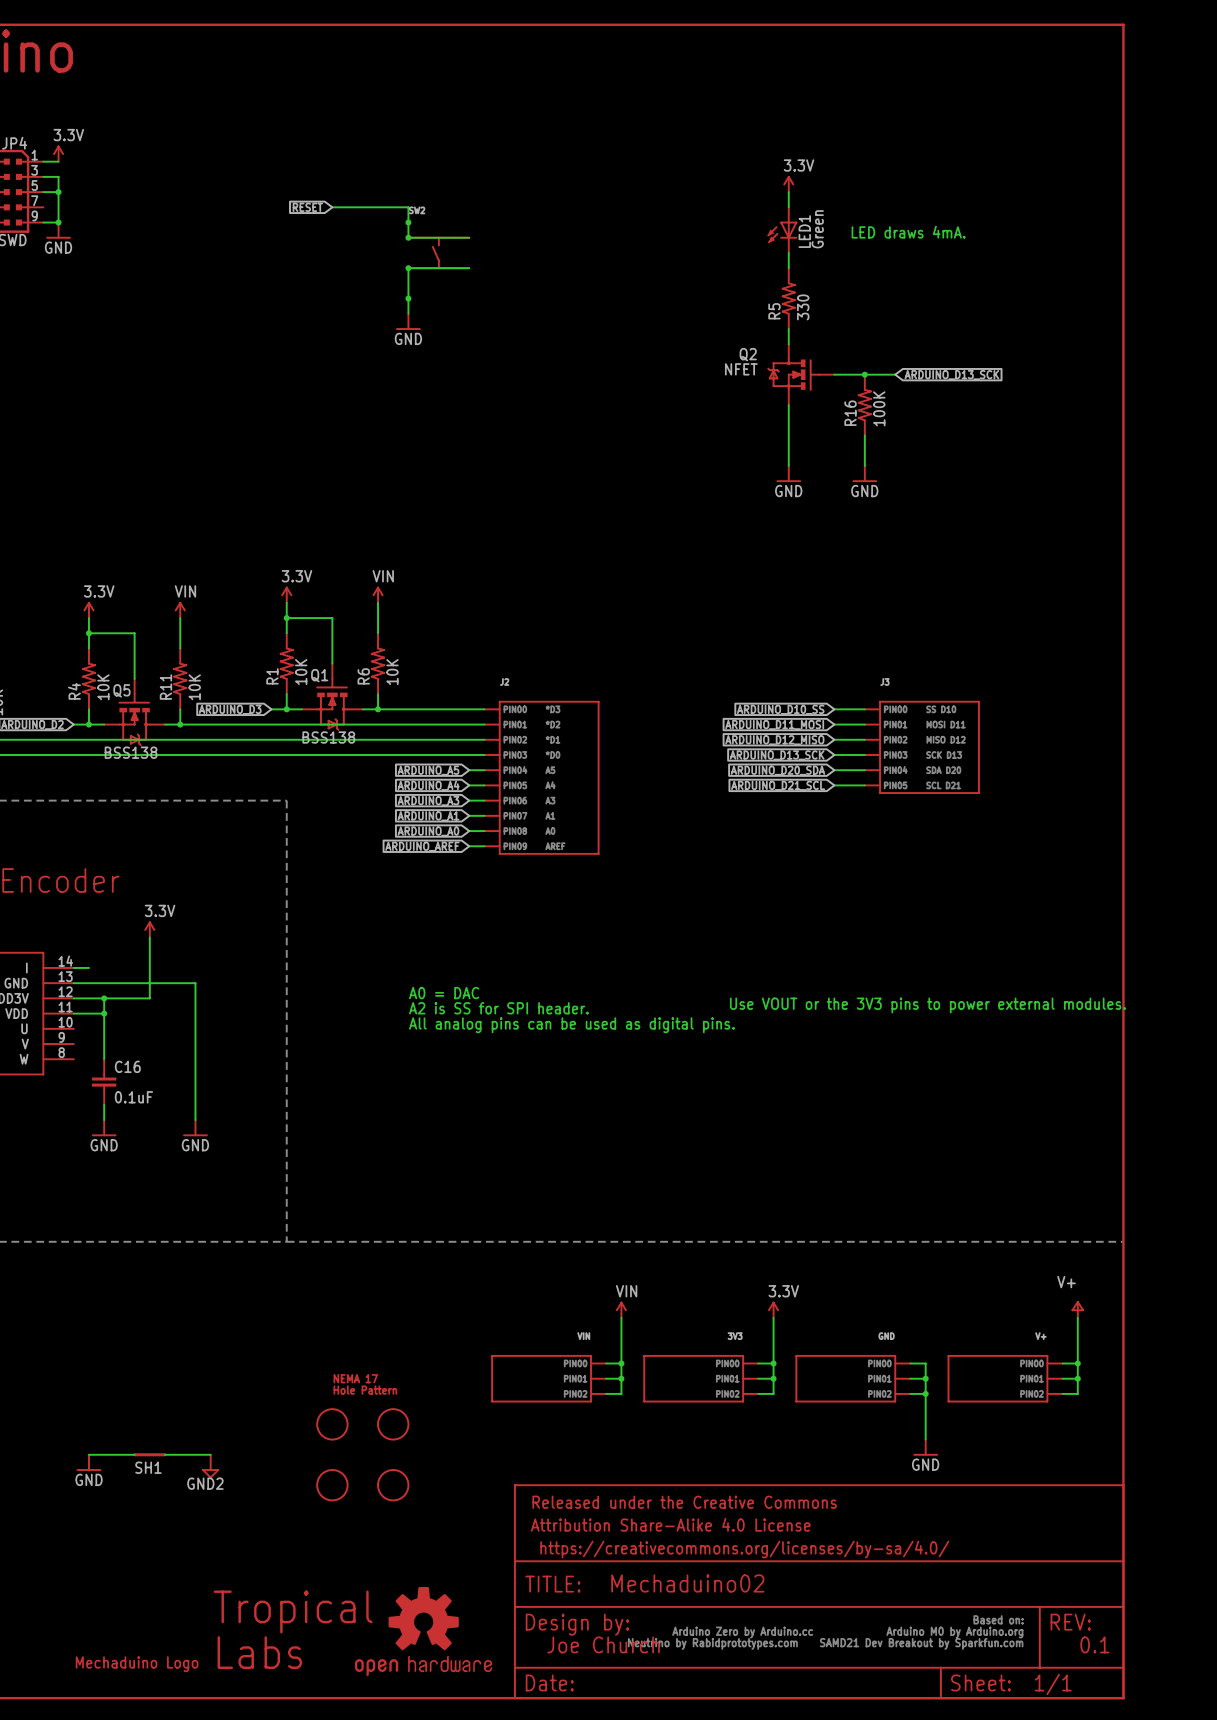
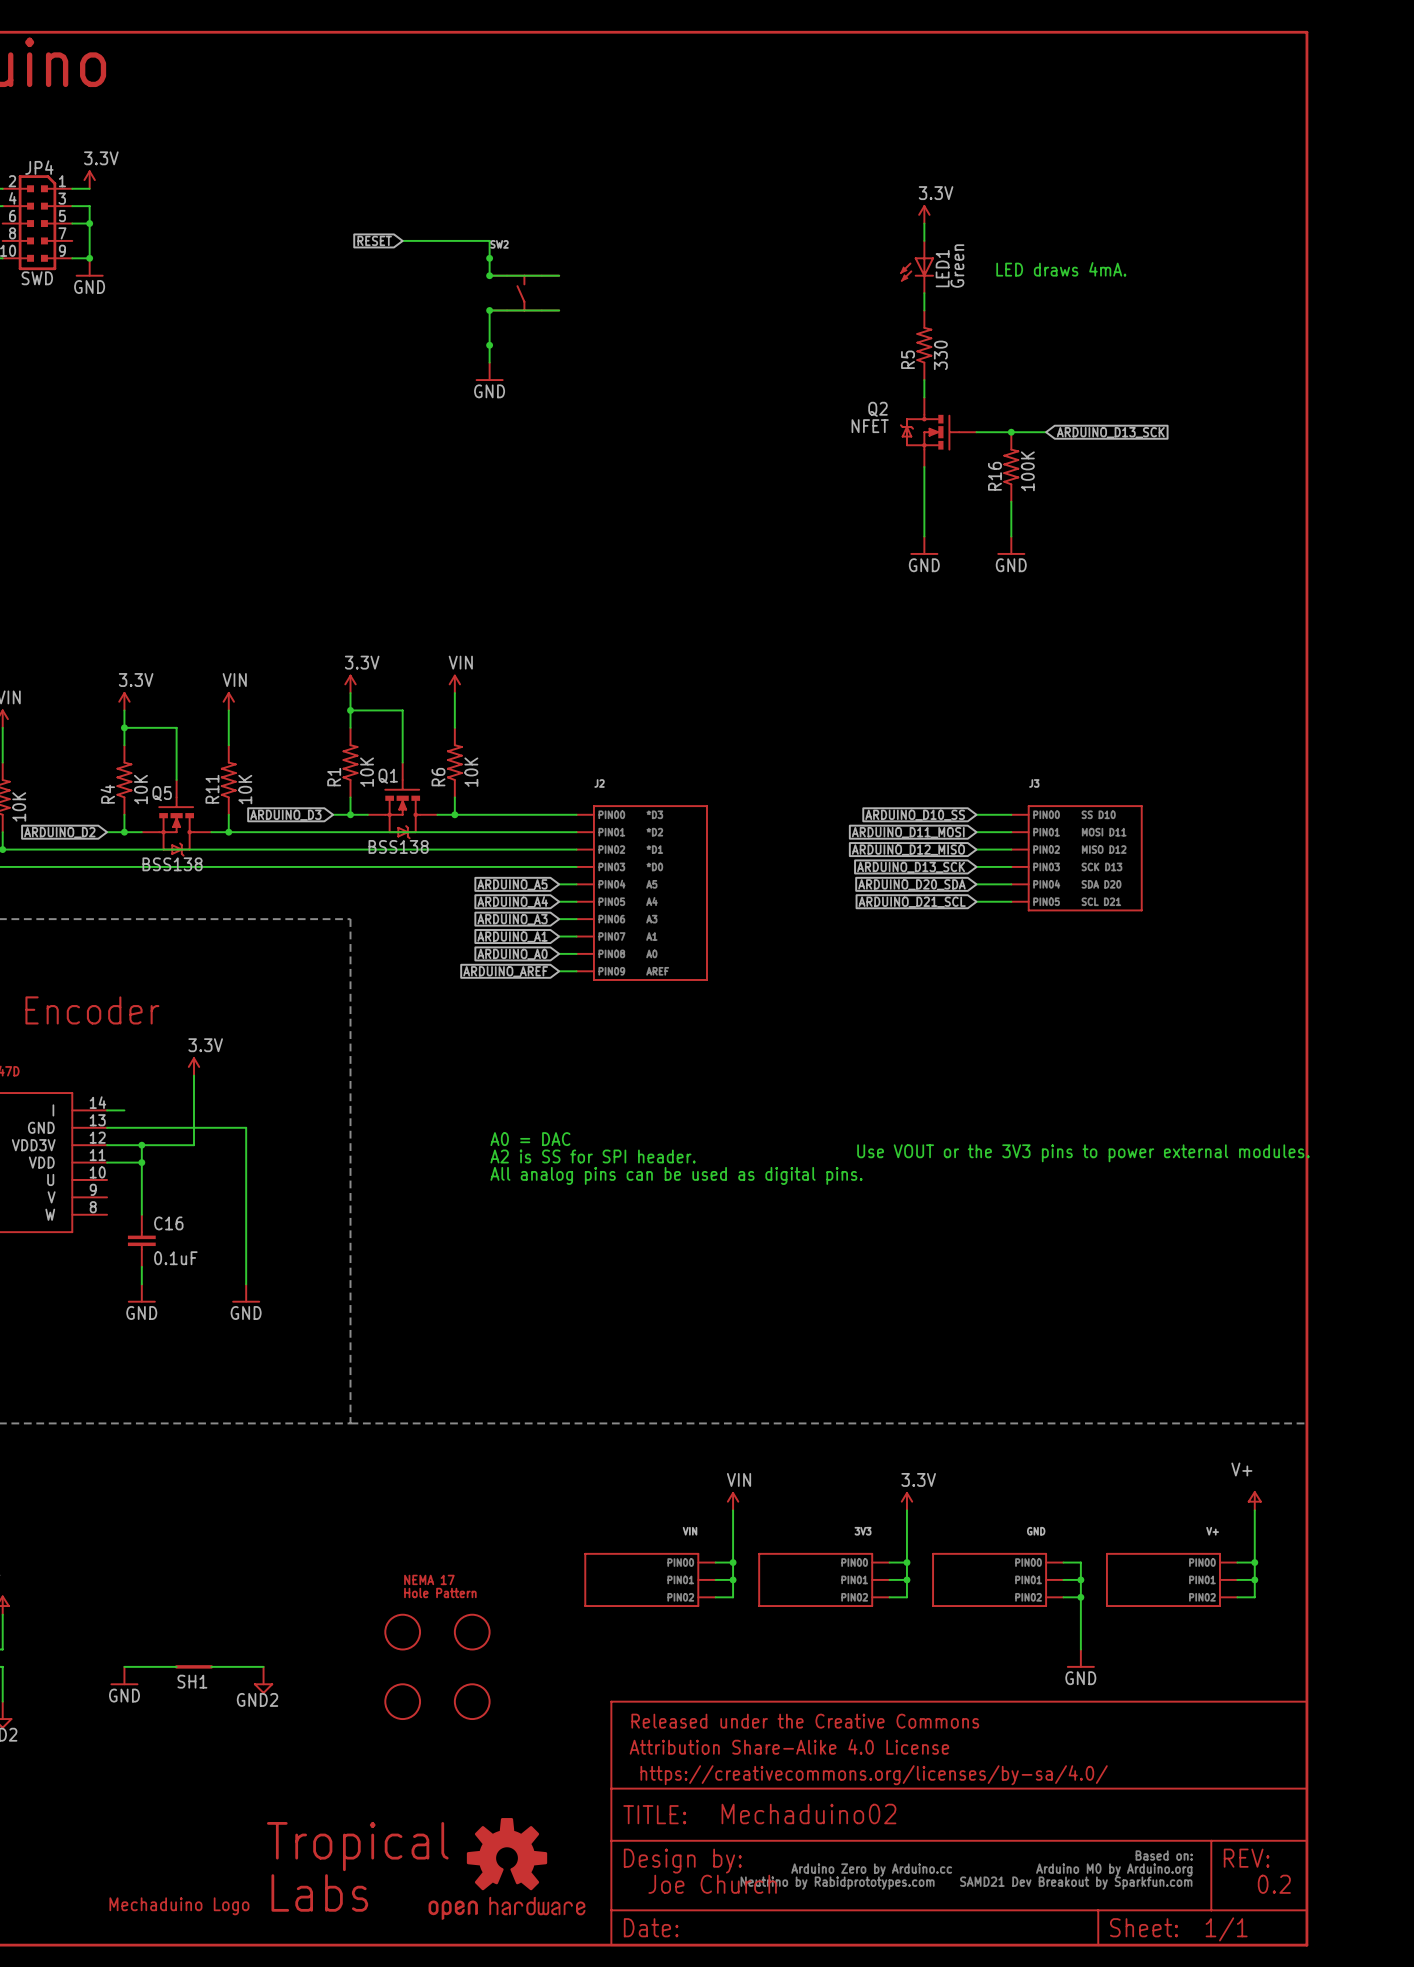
text: 0.1 (1094, 1644) -> 0.2 (1274, 1884)

